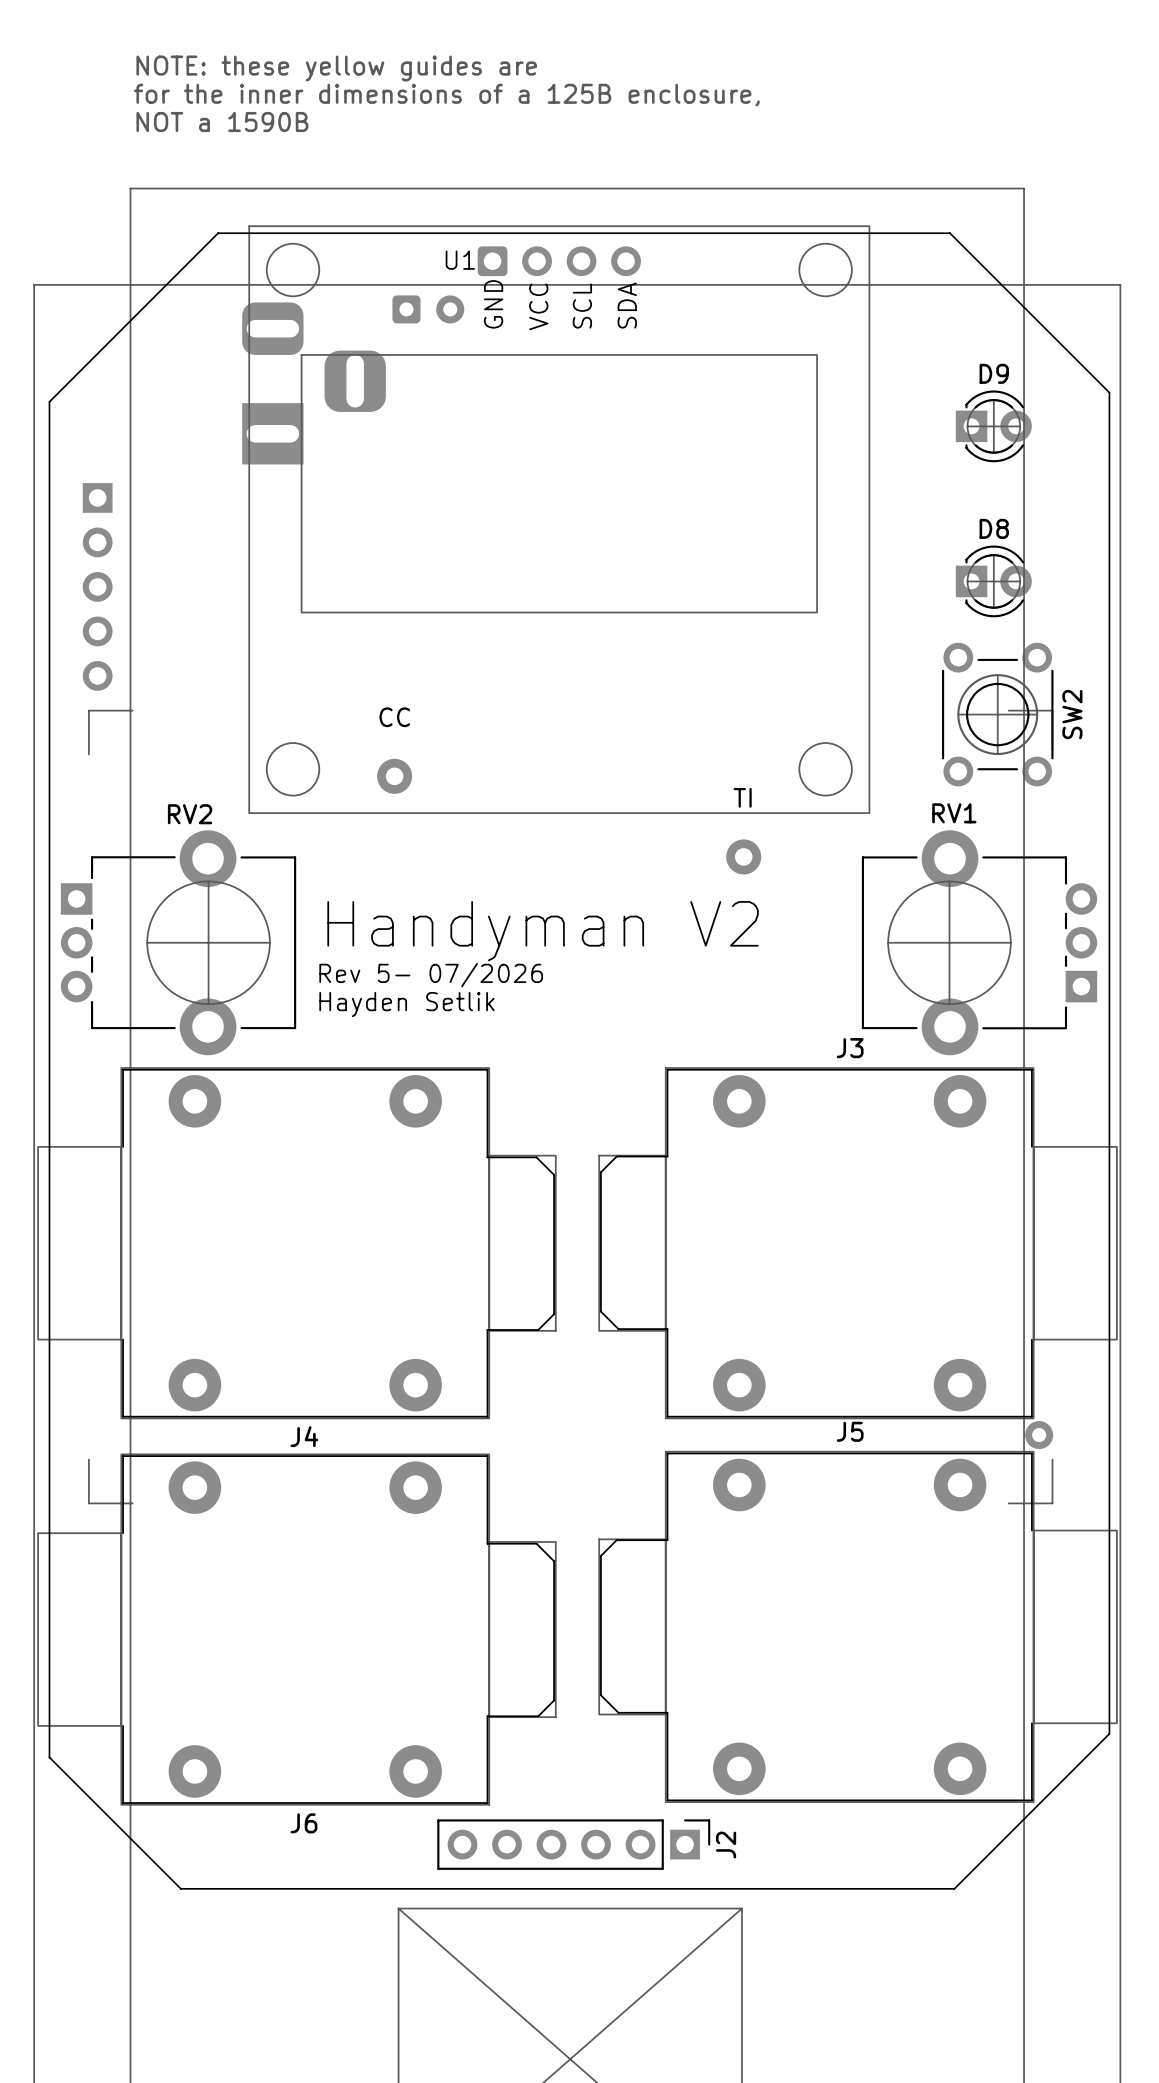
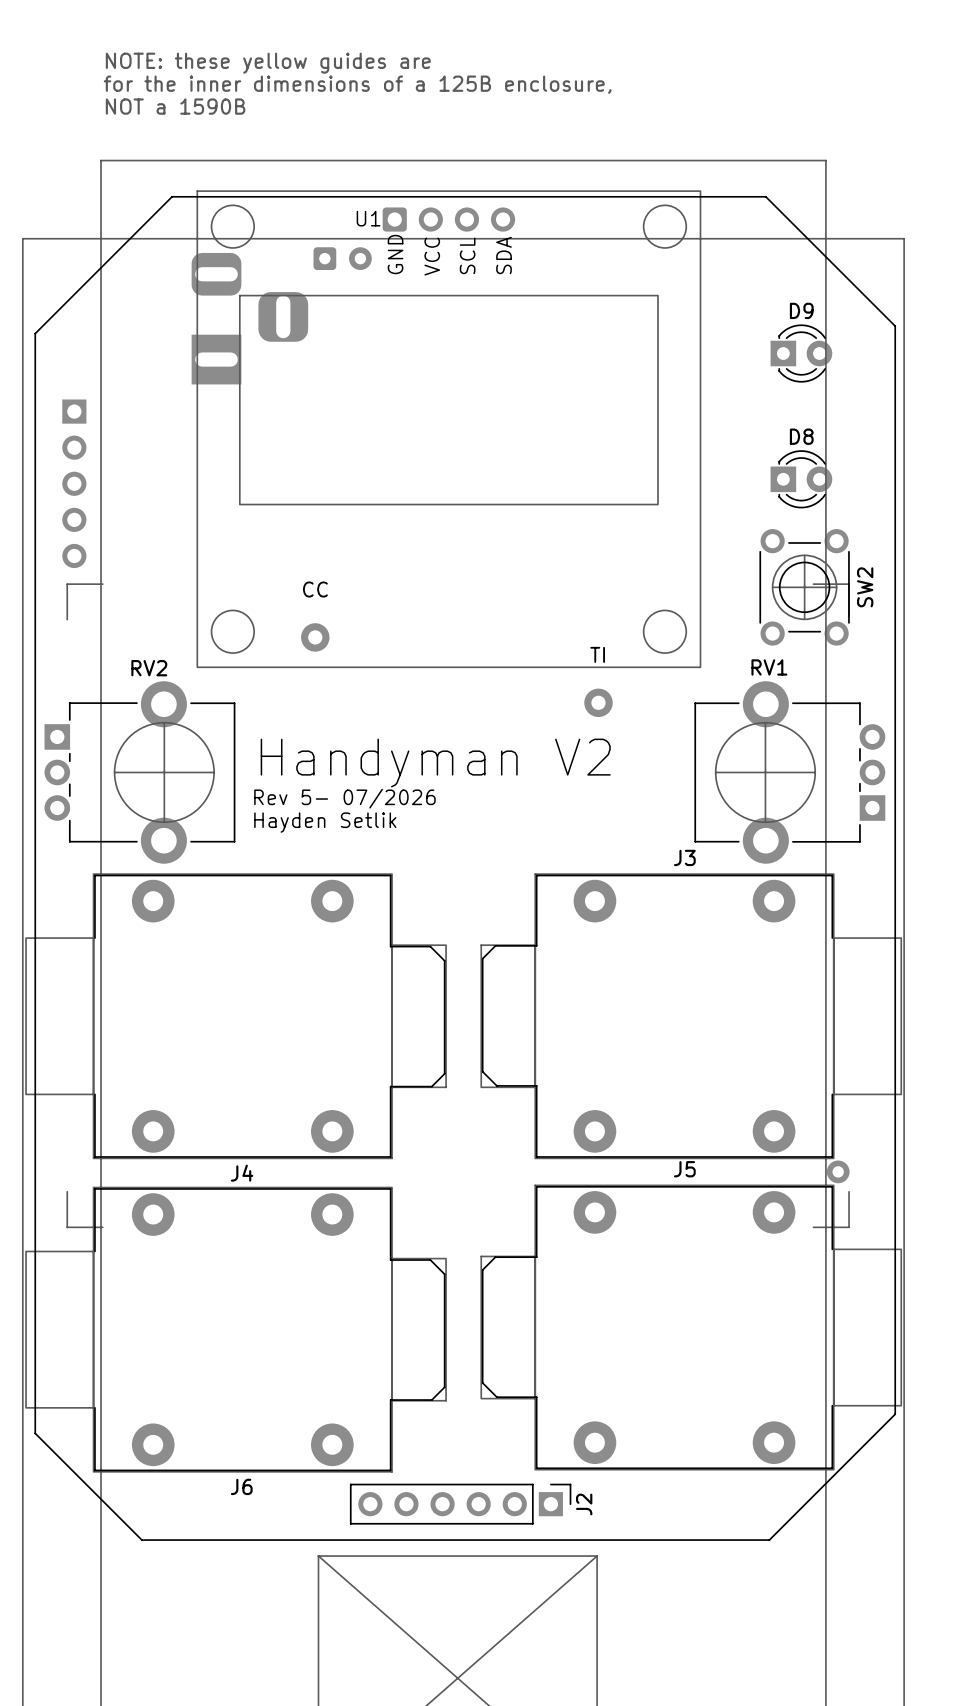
D9 footprint: [955, 390, 1032, 463] -> [770, 324, 833, 383]
D8 footprint: [955, 545, 1032, 618] -> [770, 450, 833, 509]

